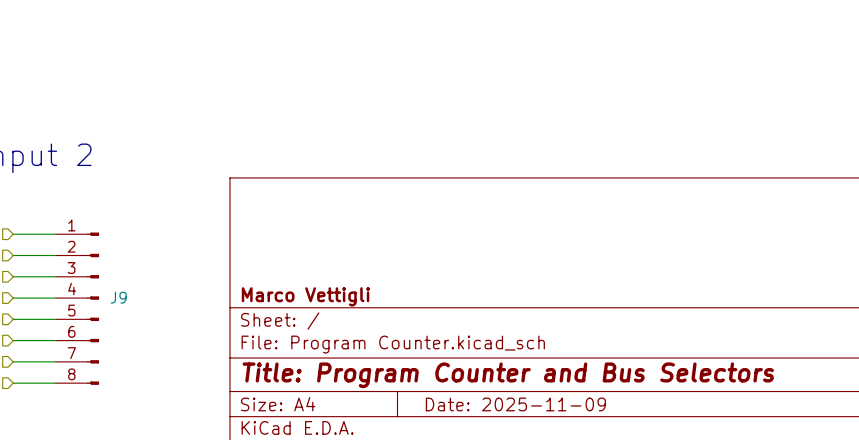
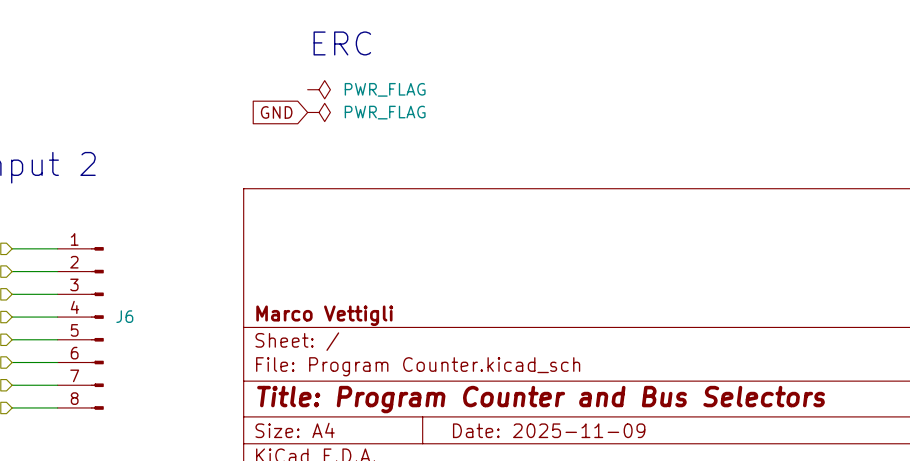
text: none -> ERC (342, 43)
power symbol: none -> PWR_FLAG (319, 89)
global label: none -> GND (276, 112)
power symbol: none -> PWR_FLAG (319, 112)
J9 name: J9 (118, 297) -> J6 (124, 316)

